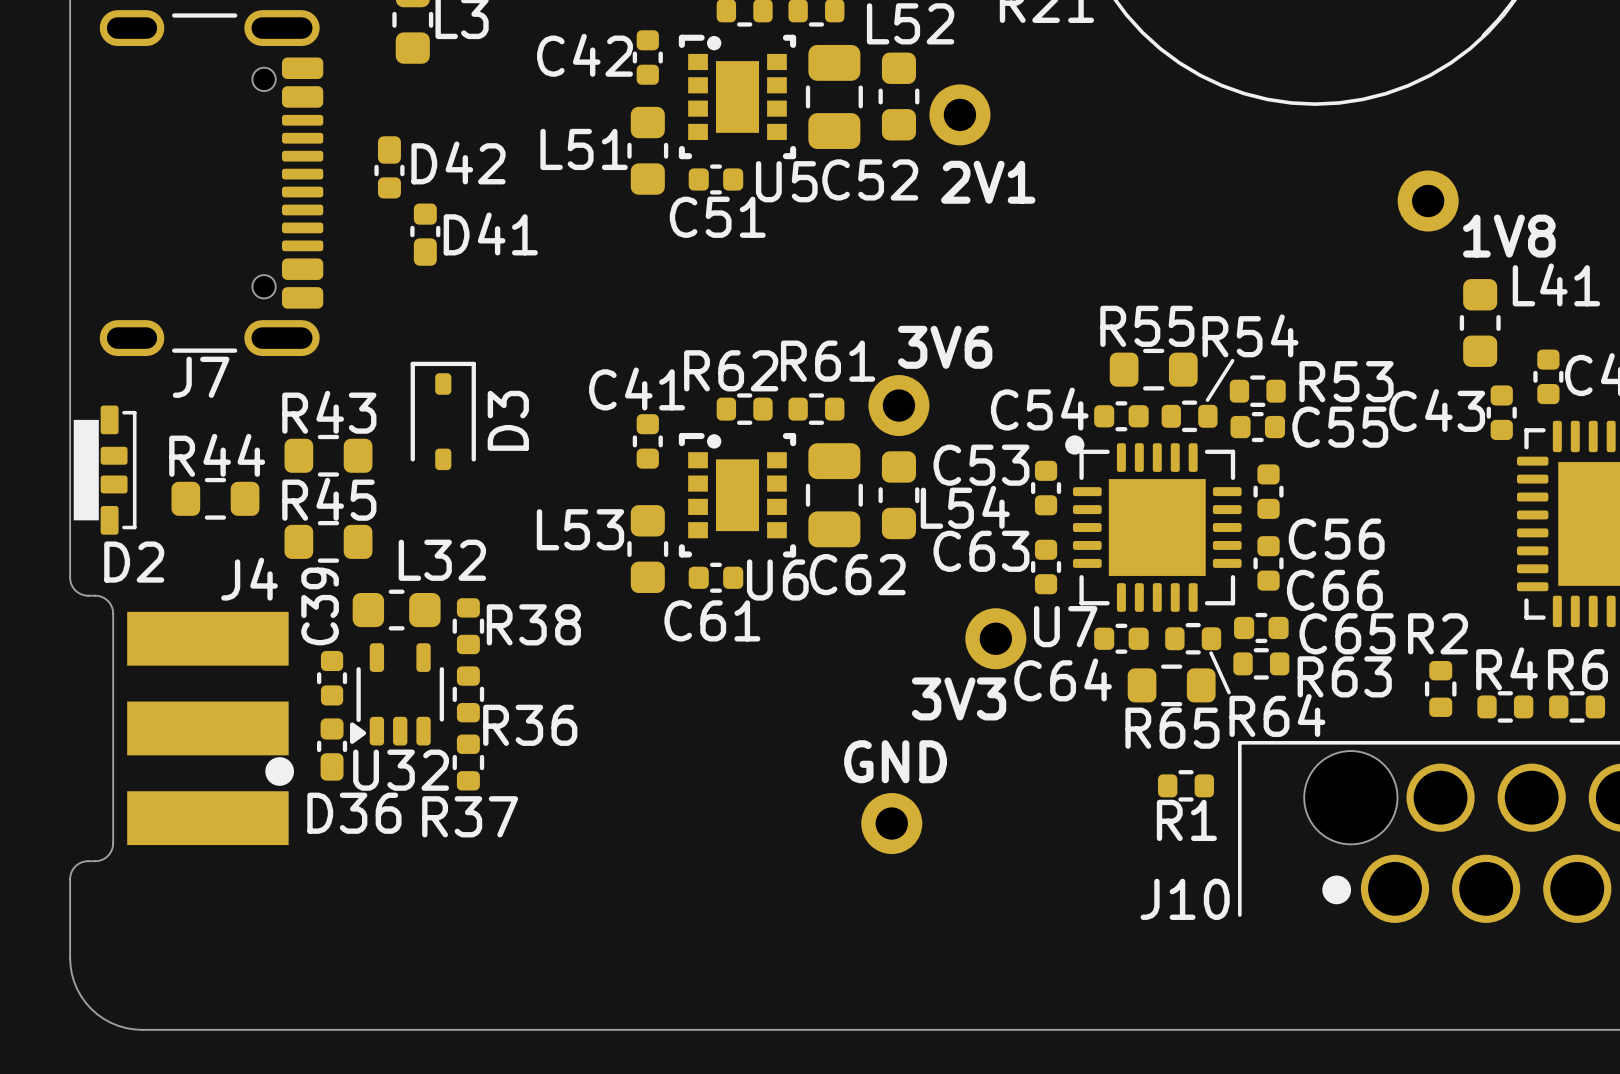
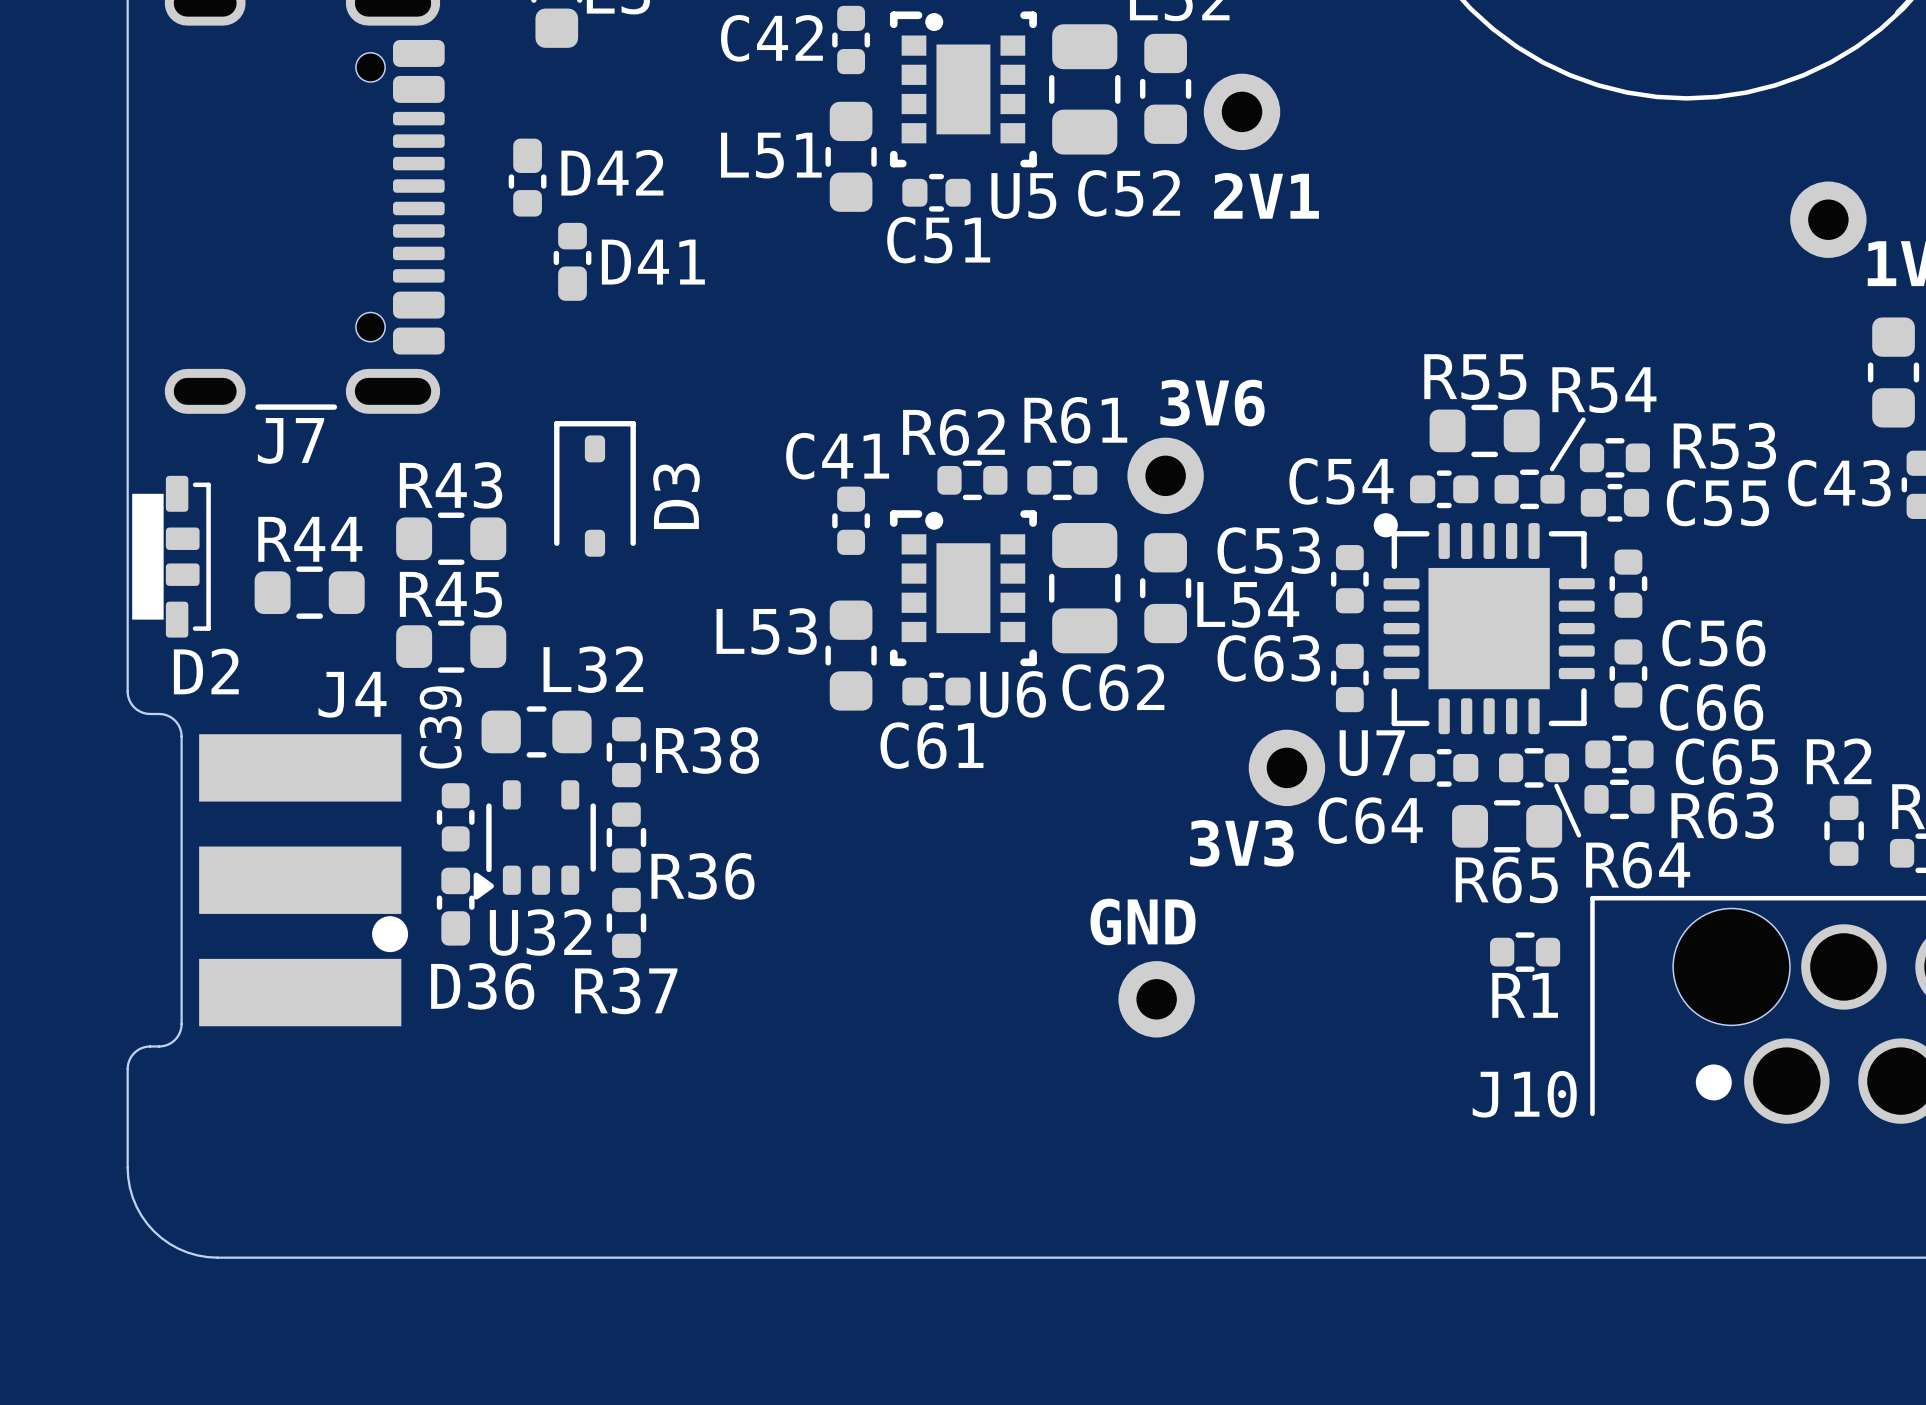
U32 footprint: [349, 643, 445, 746] -> [473, 780, 596, 900]

